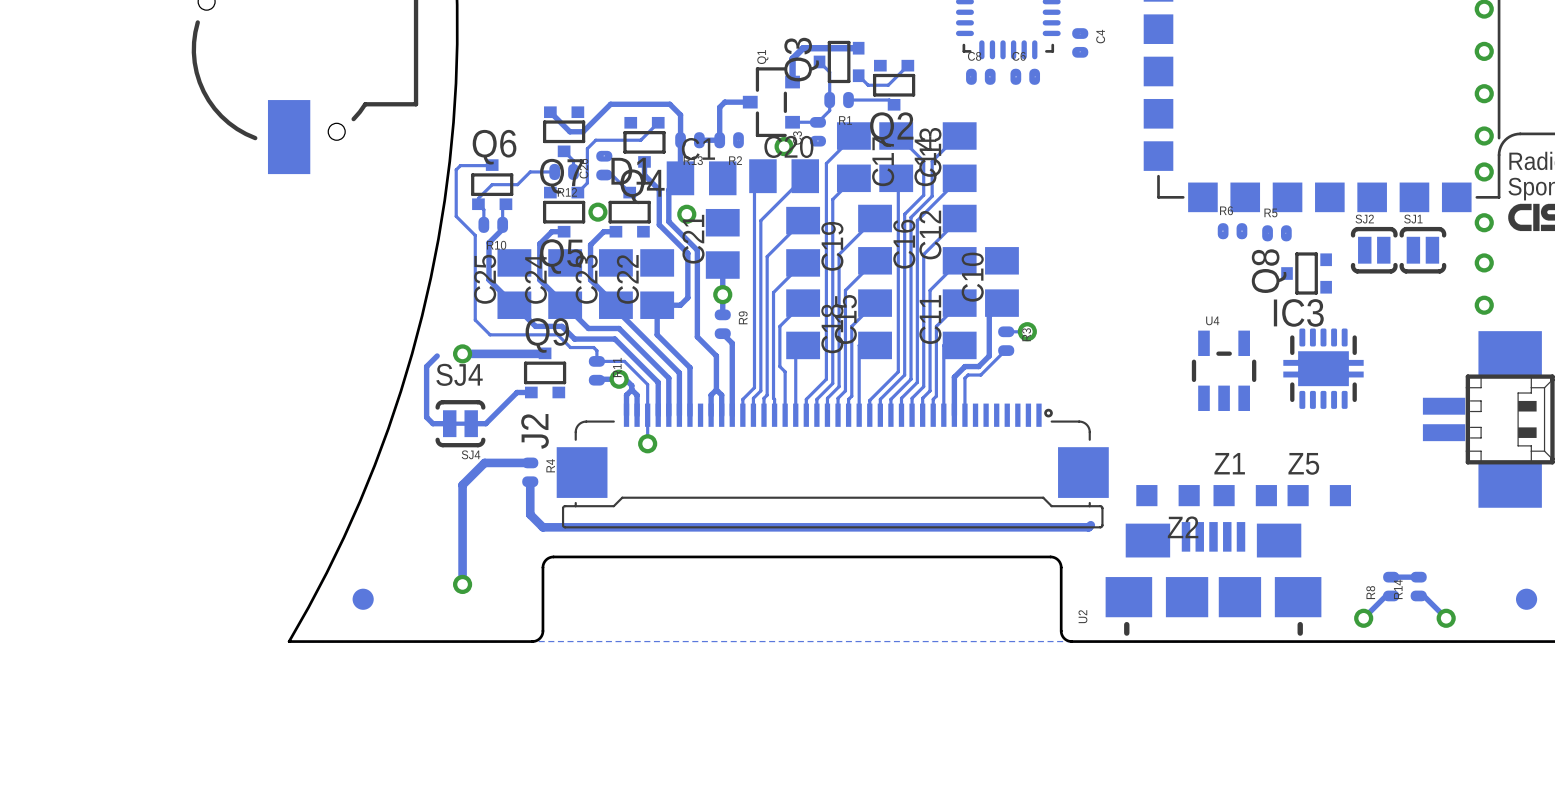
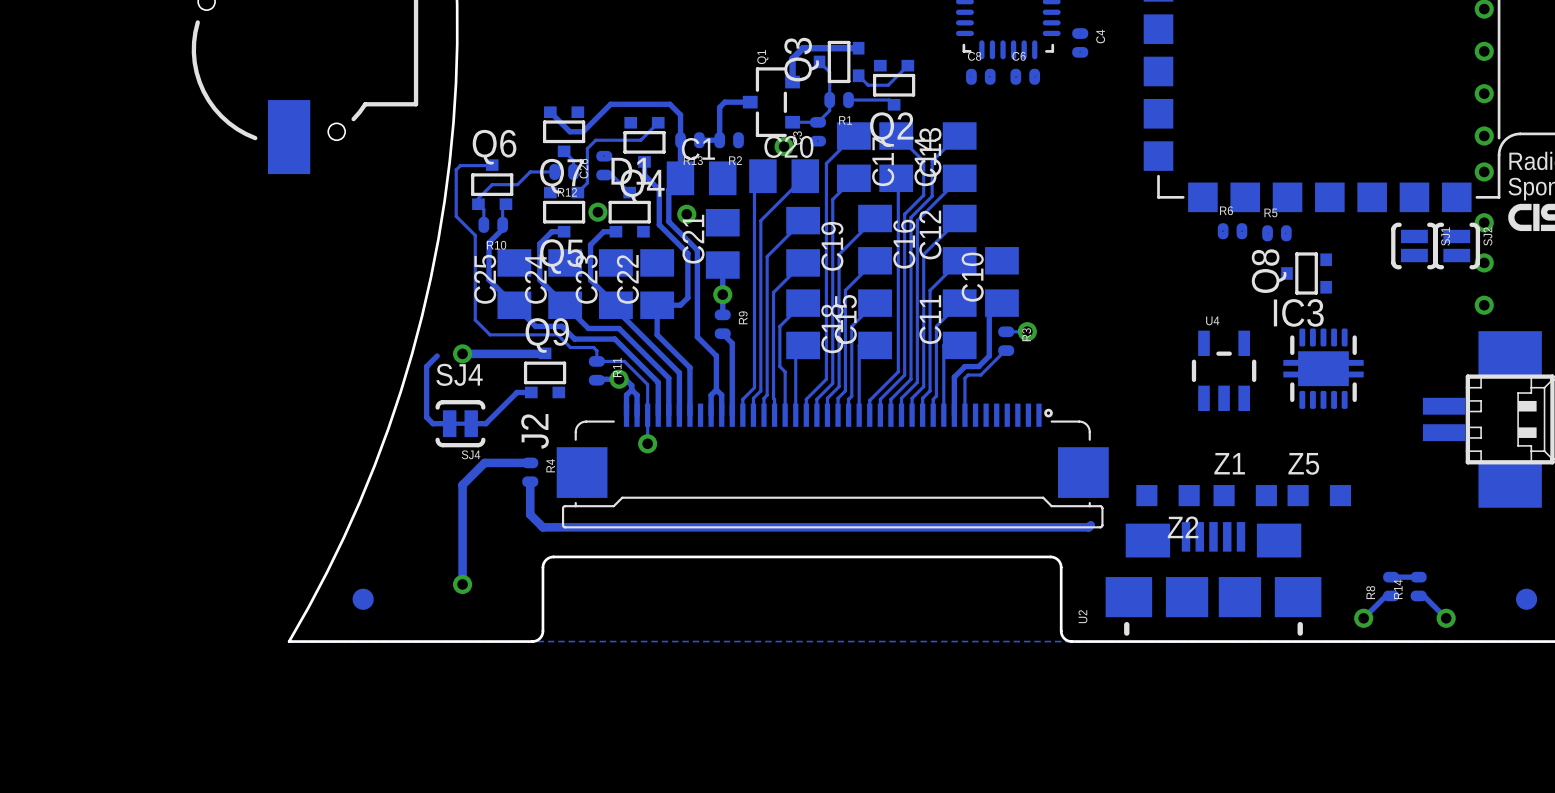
SJ2 rotation: 0° (1374, 250) -> 90° clockwise (1456, 246)
SJ2 position: (1374, 250) -> (1456, 246)
SJ1 rotation: 0° (1422, 250) -> 90° clockwise (1414, 246)

